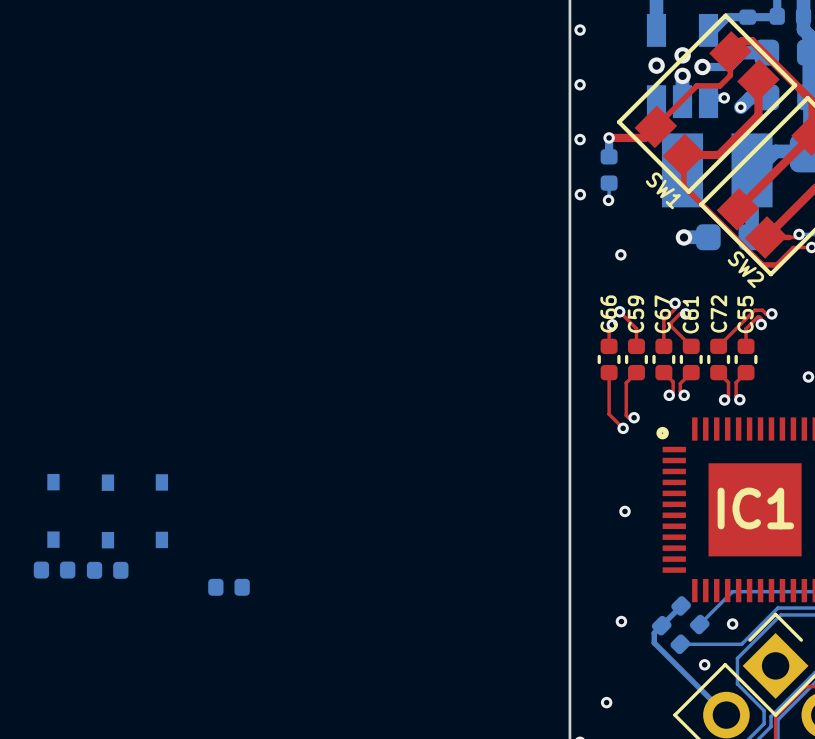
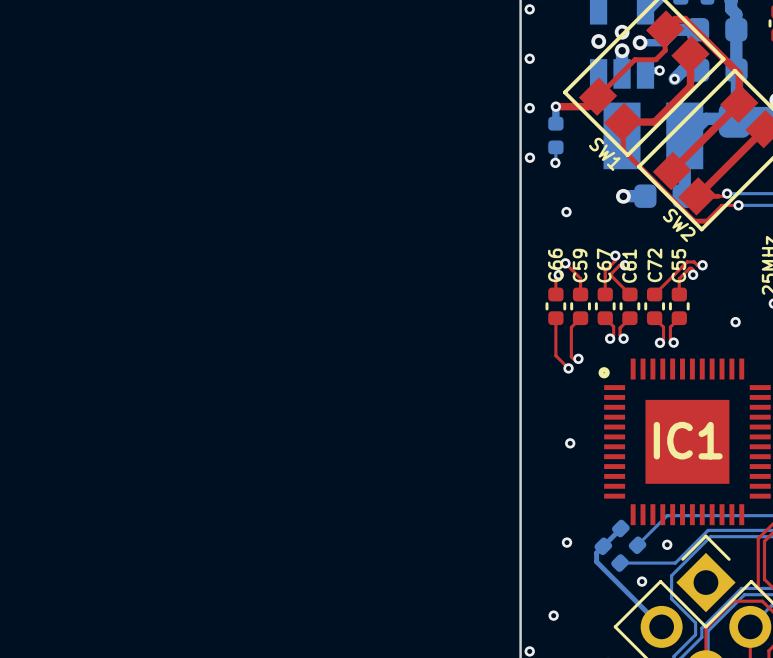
part: (53, 510) -> none
part: (107, 511) -> none
part: (161, 511) -> none
part: (54, 570) -> none
part: (107, 570) -> none
part: (229, 587) -> none

